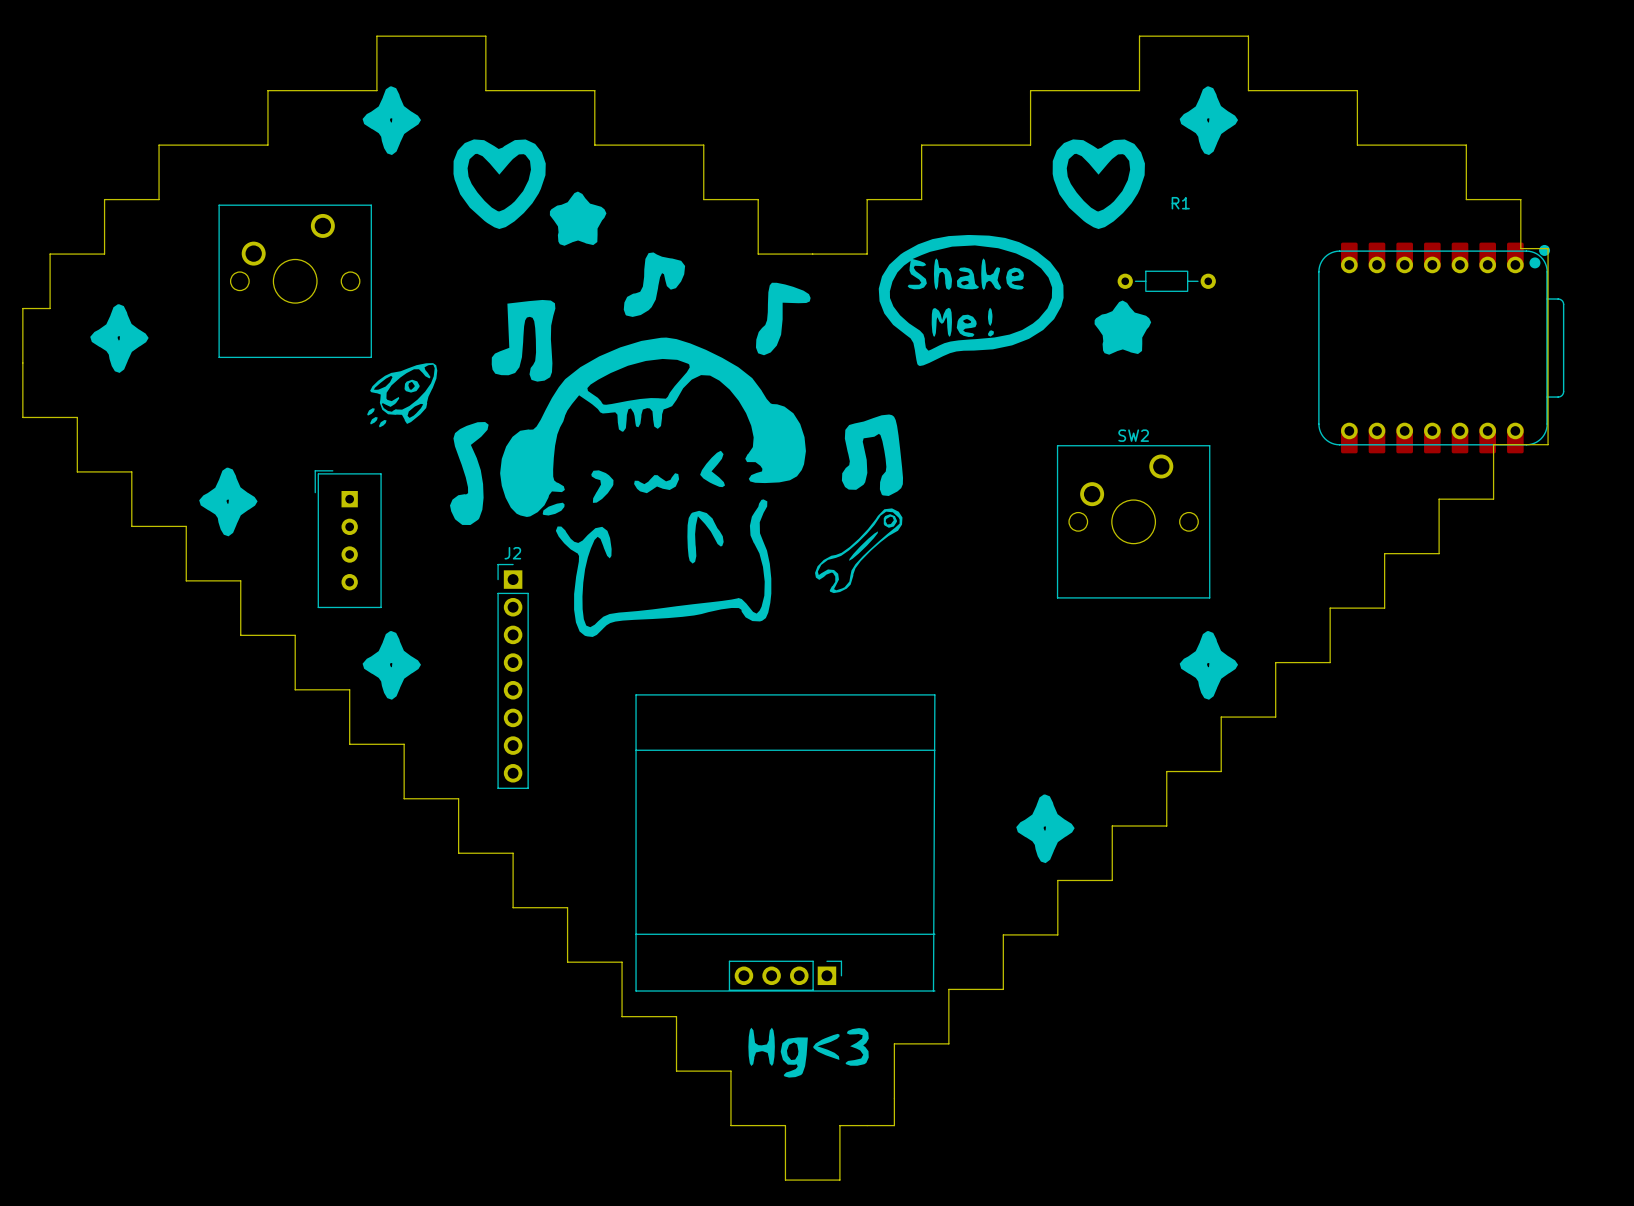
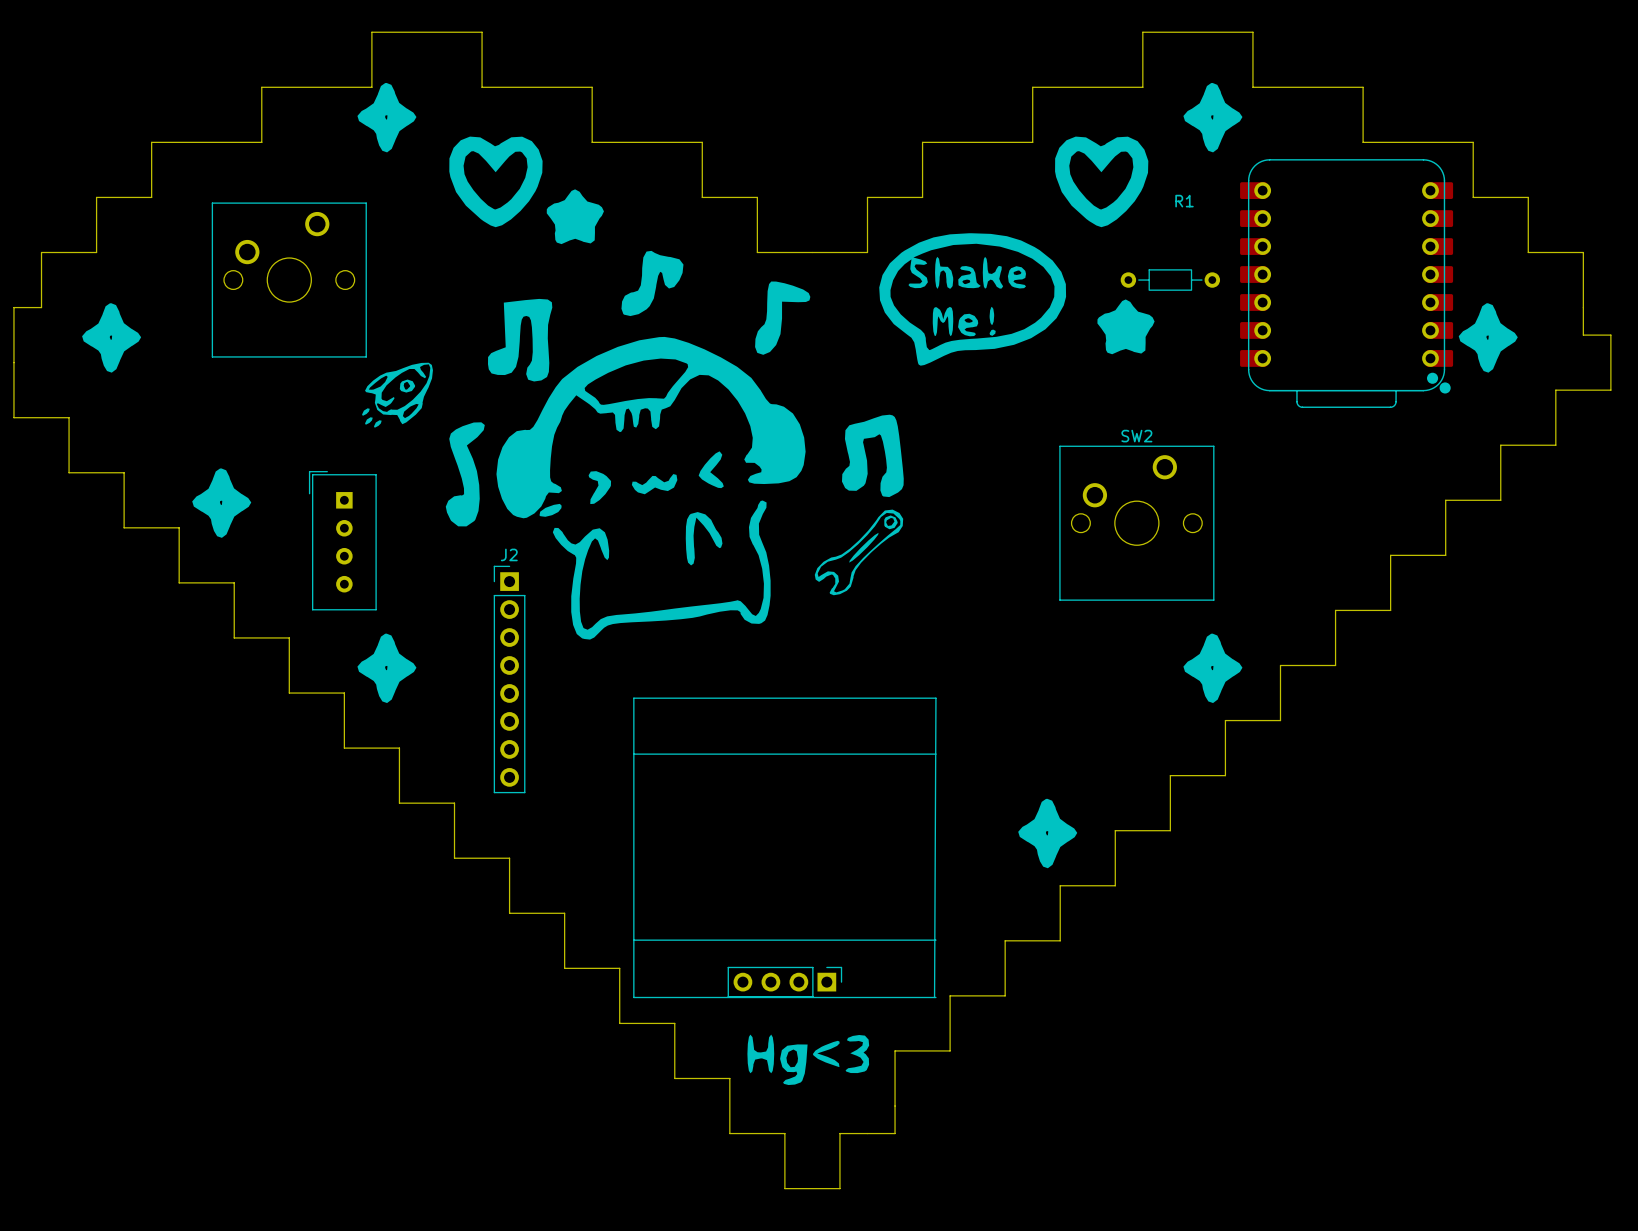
board edge: (1520, 248) (1548, 248) (1548, 390) -> (1528, 246) (1528, 252) (1583, 252) (1583, 335) (1610, 335) (1610, 390) (1555, 390)
drawing: none -> [1458, 303, 1518, 373]
part rotation: 0° (1441, 347) -> 90° clockwise (1346, 283)

